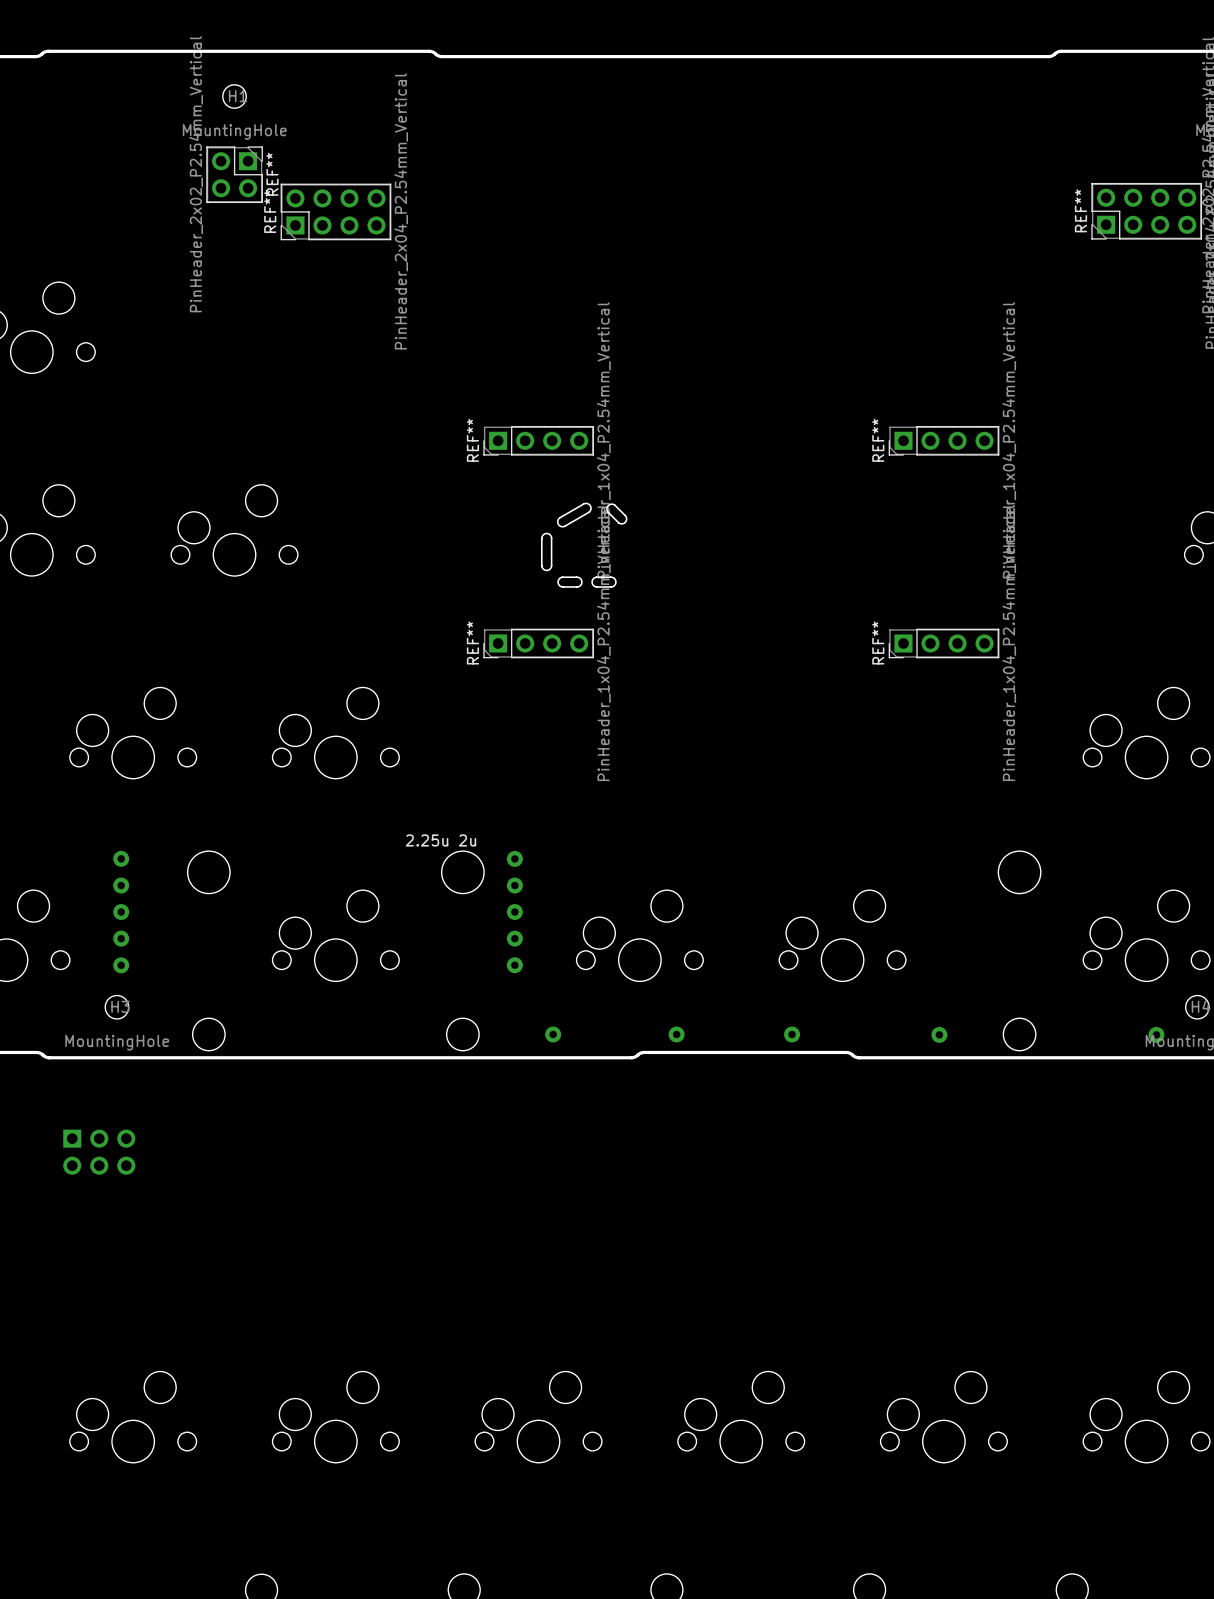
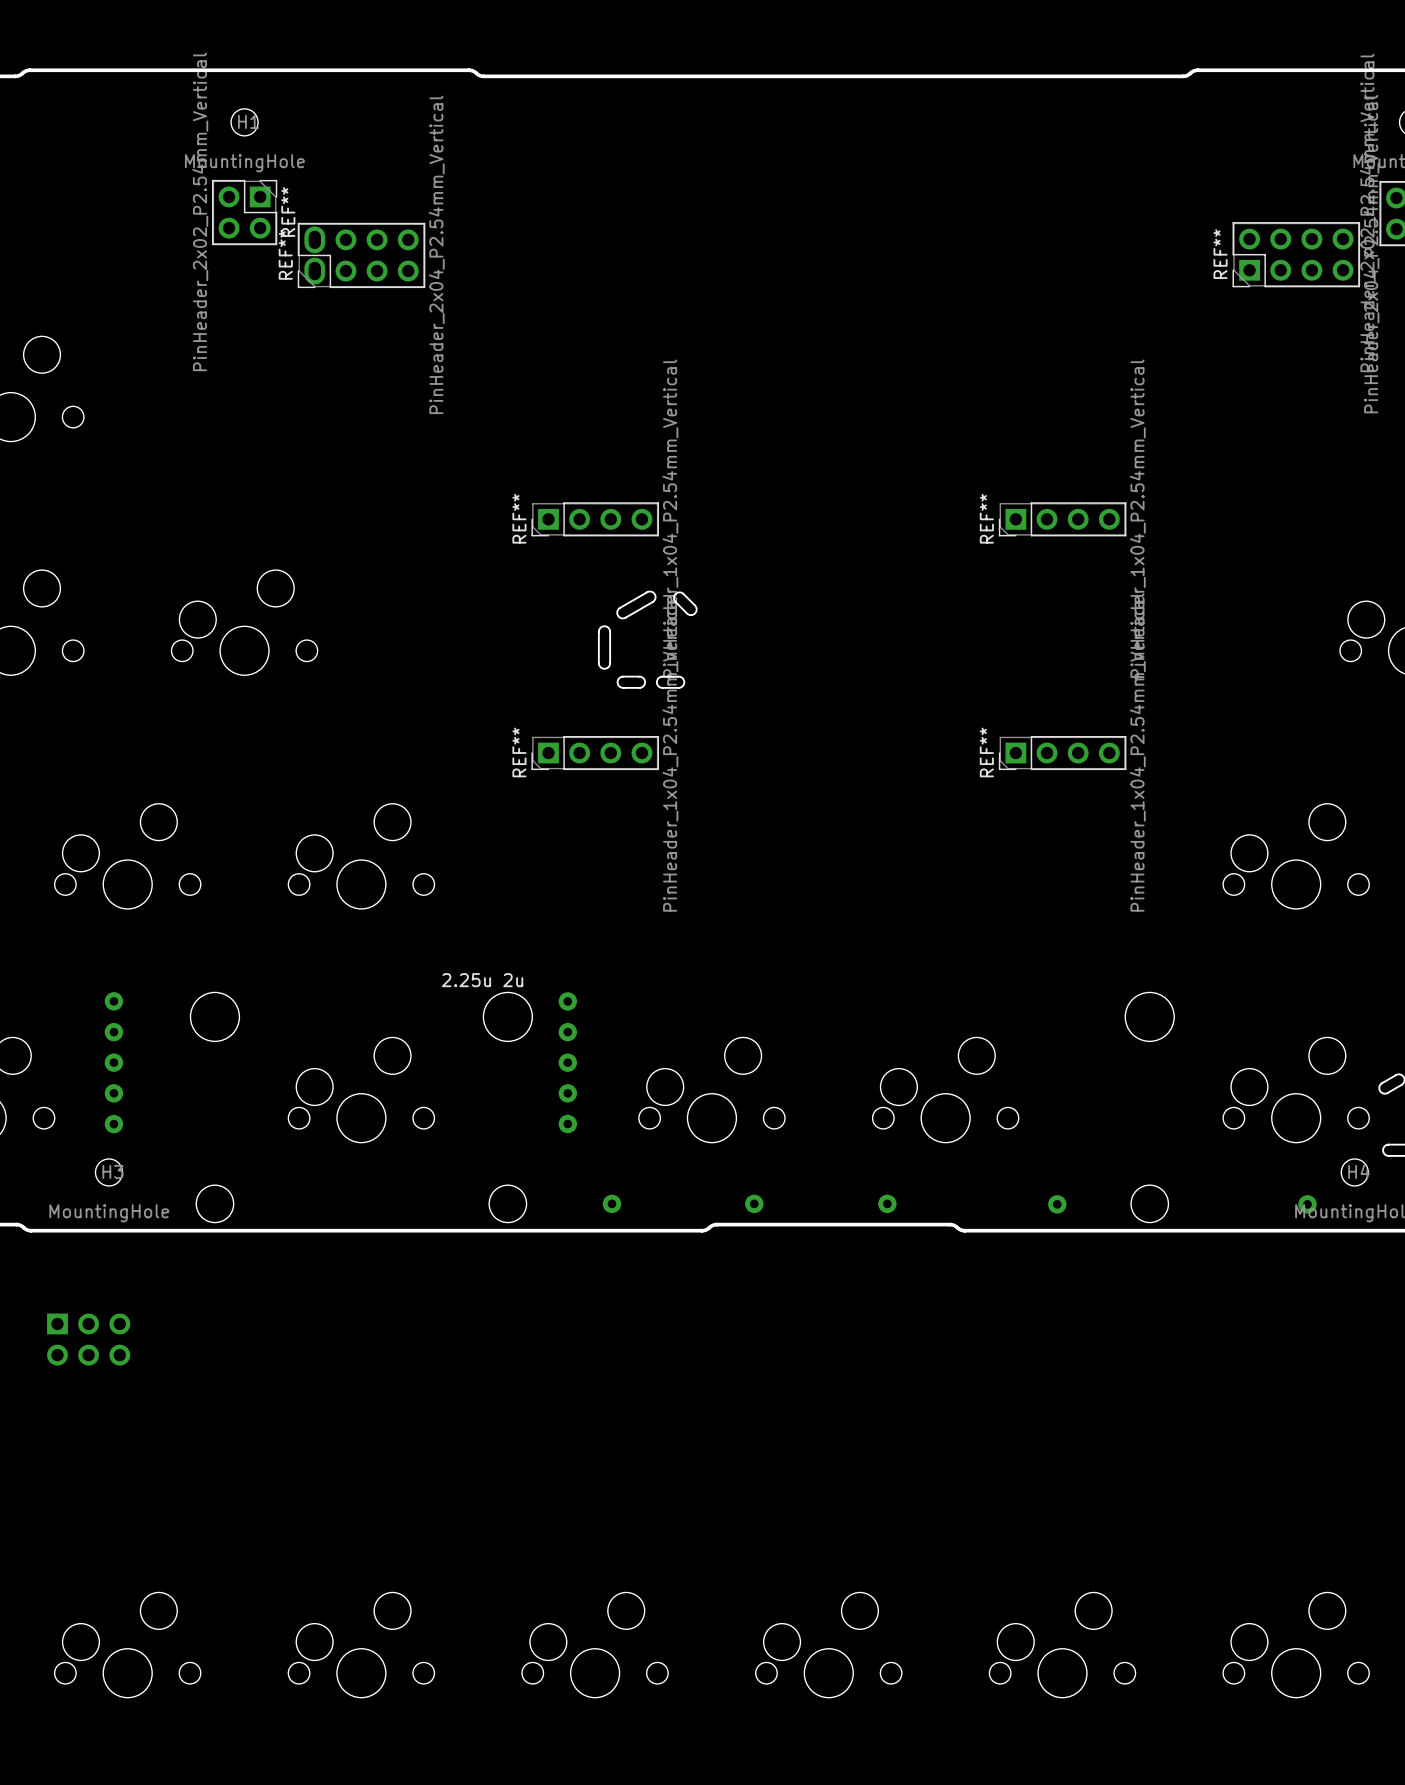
REF** footprint: [280, 183, 392, 241] -> [297, 222, 426, 289]

